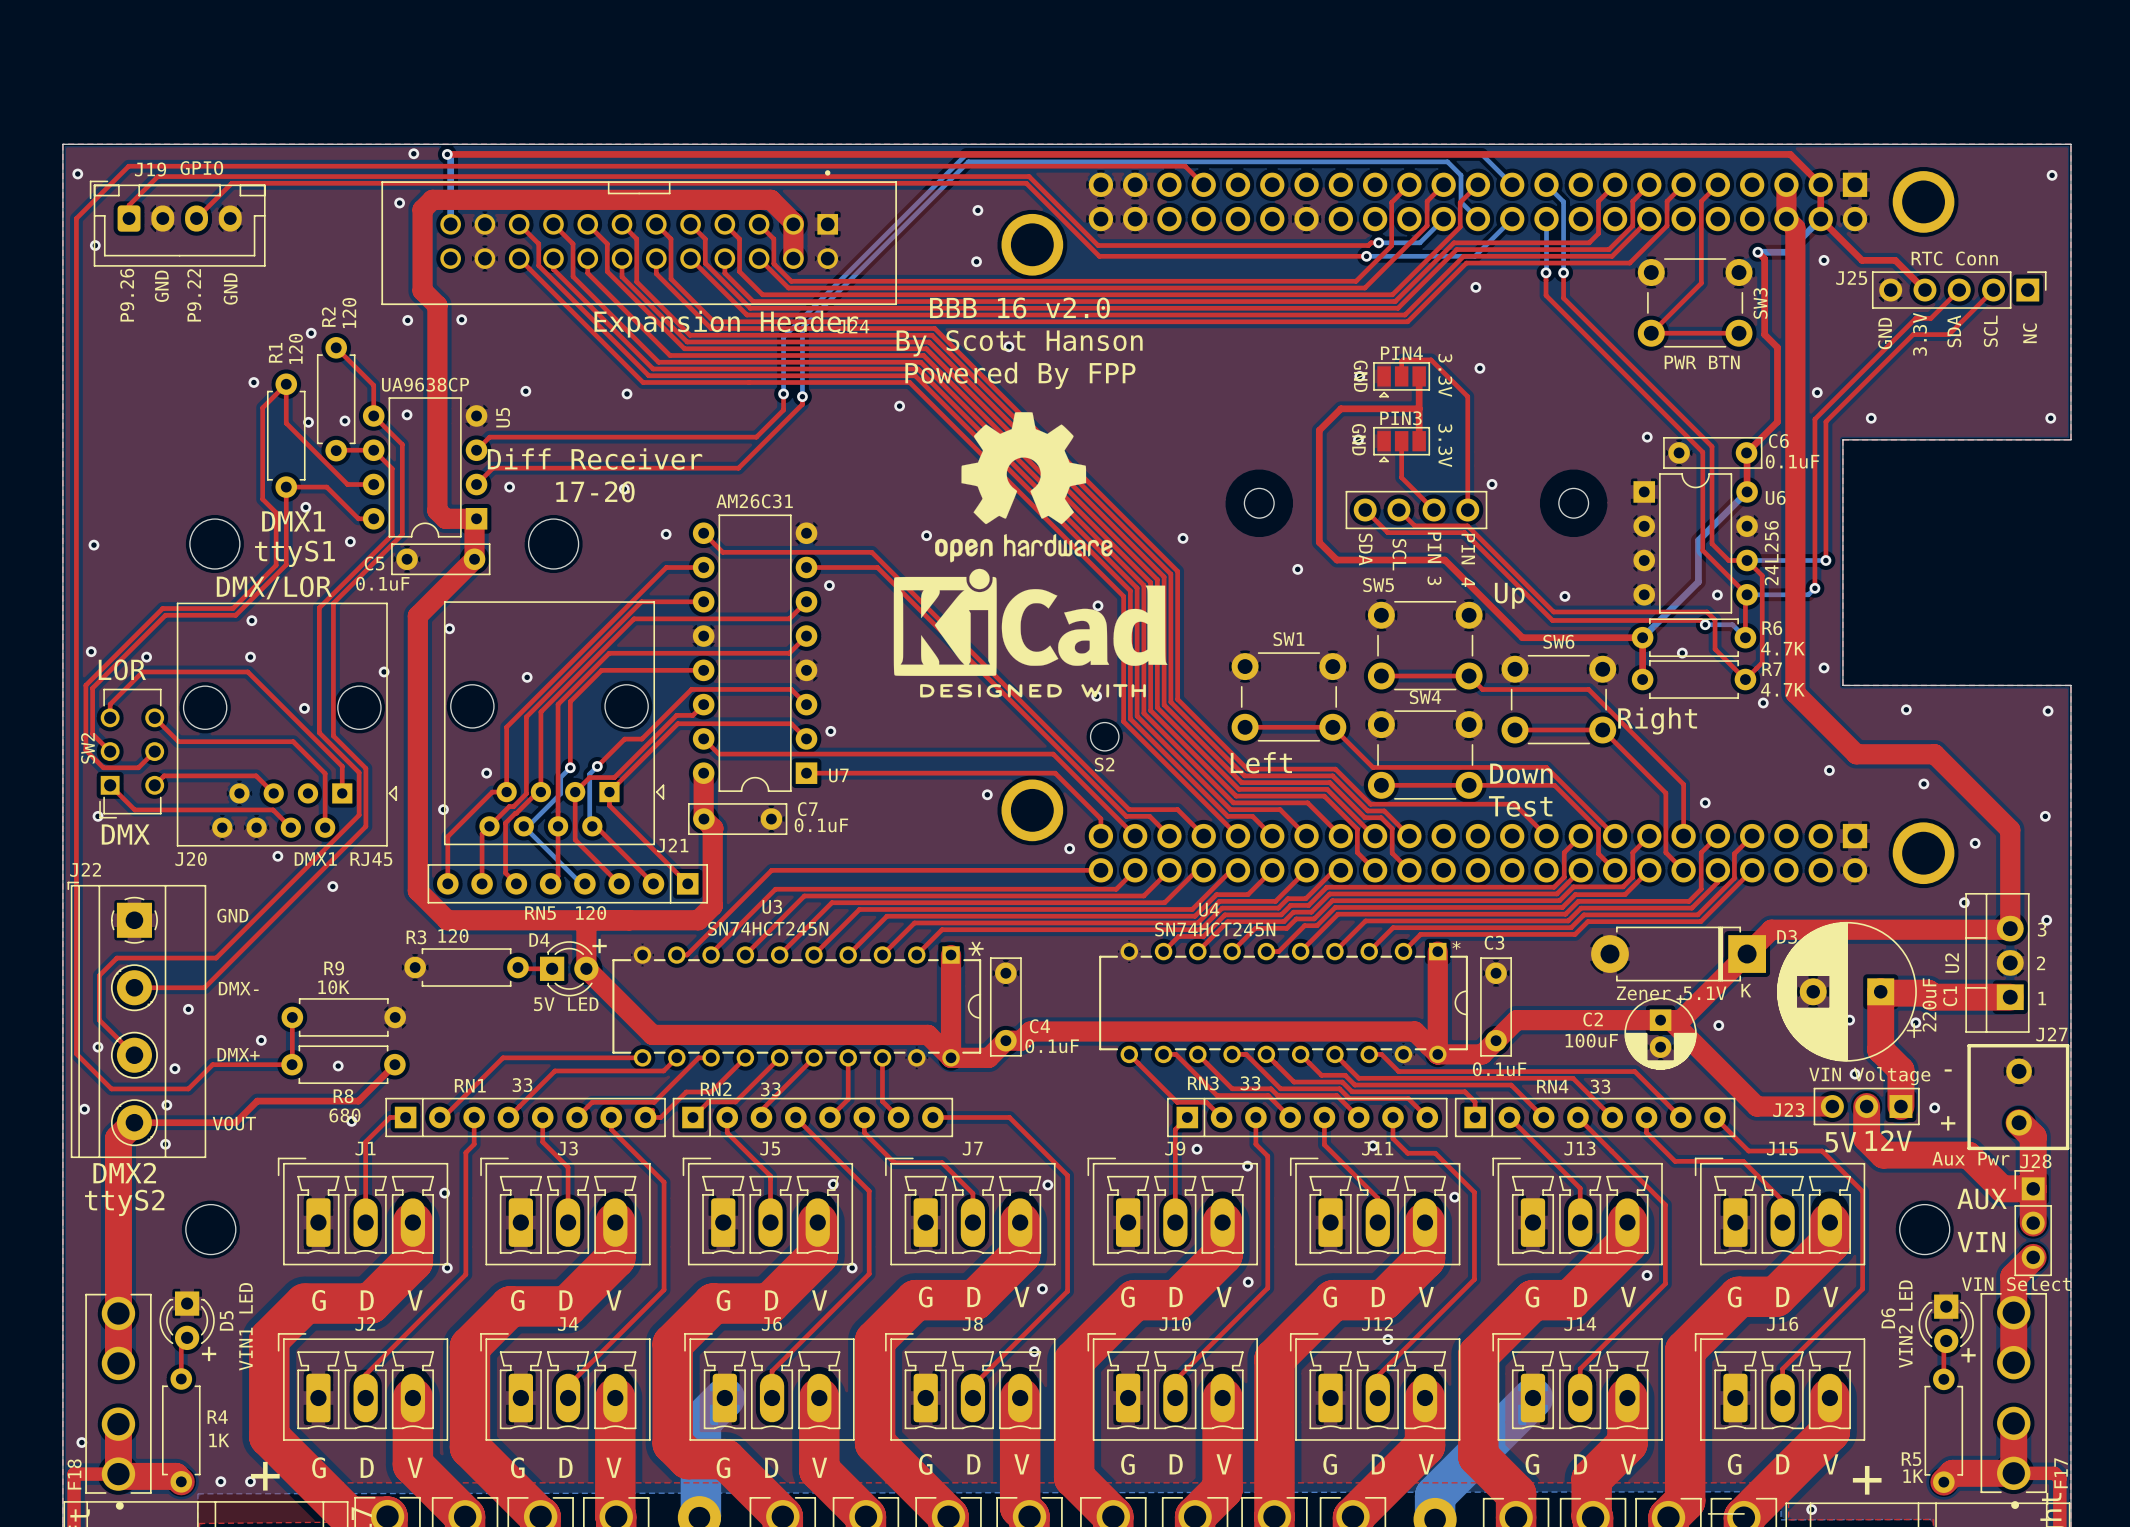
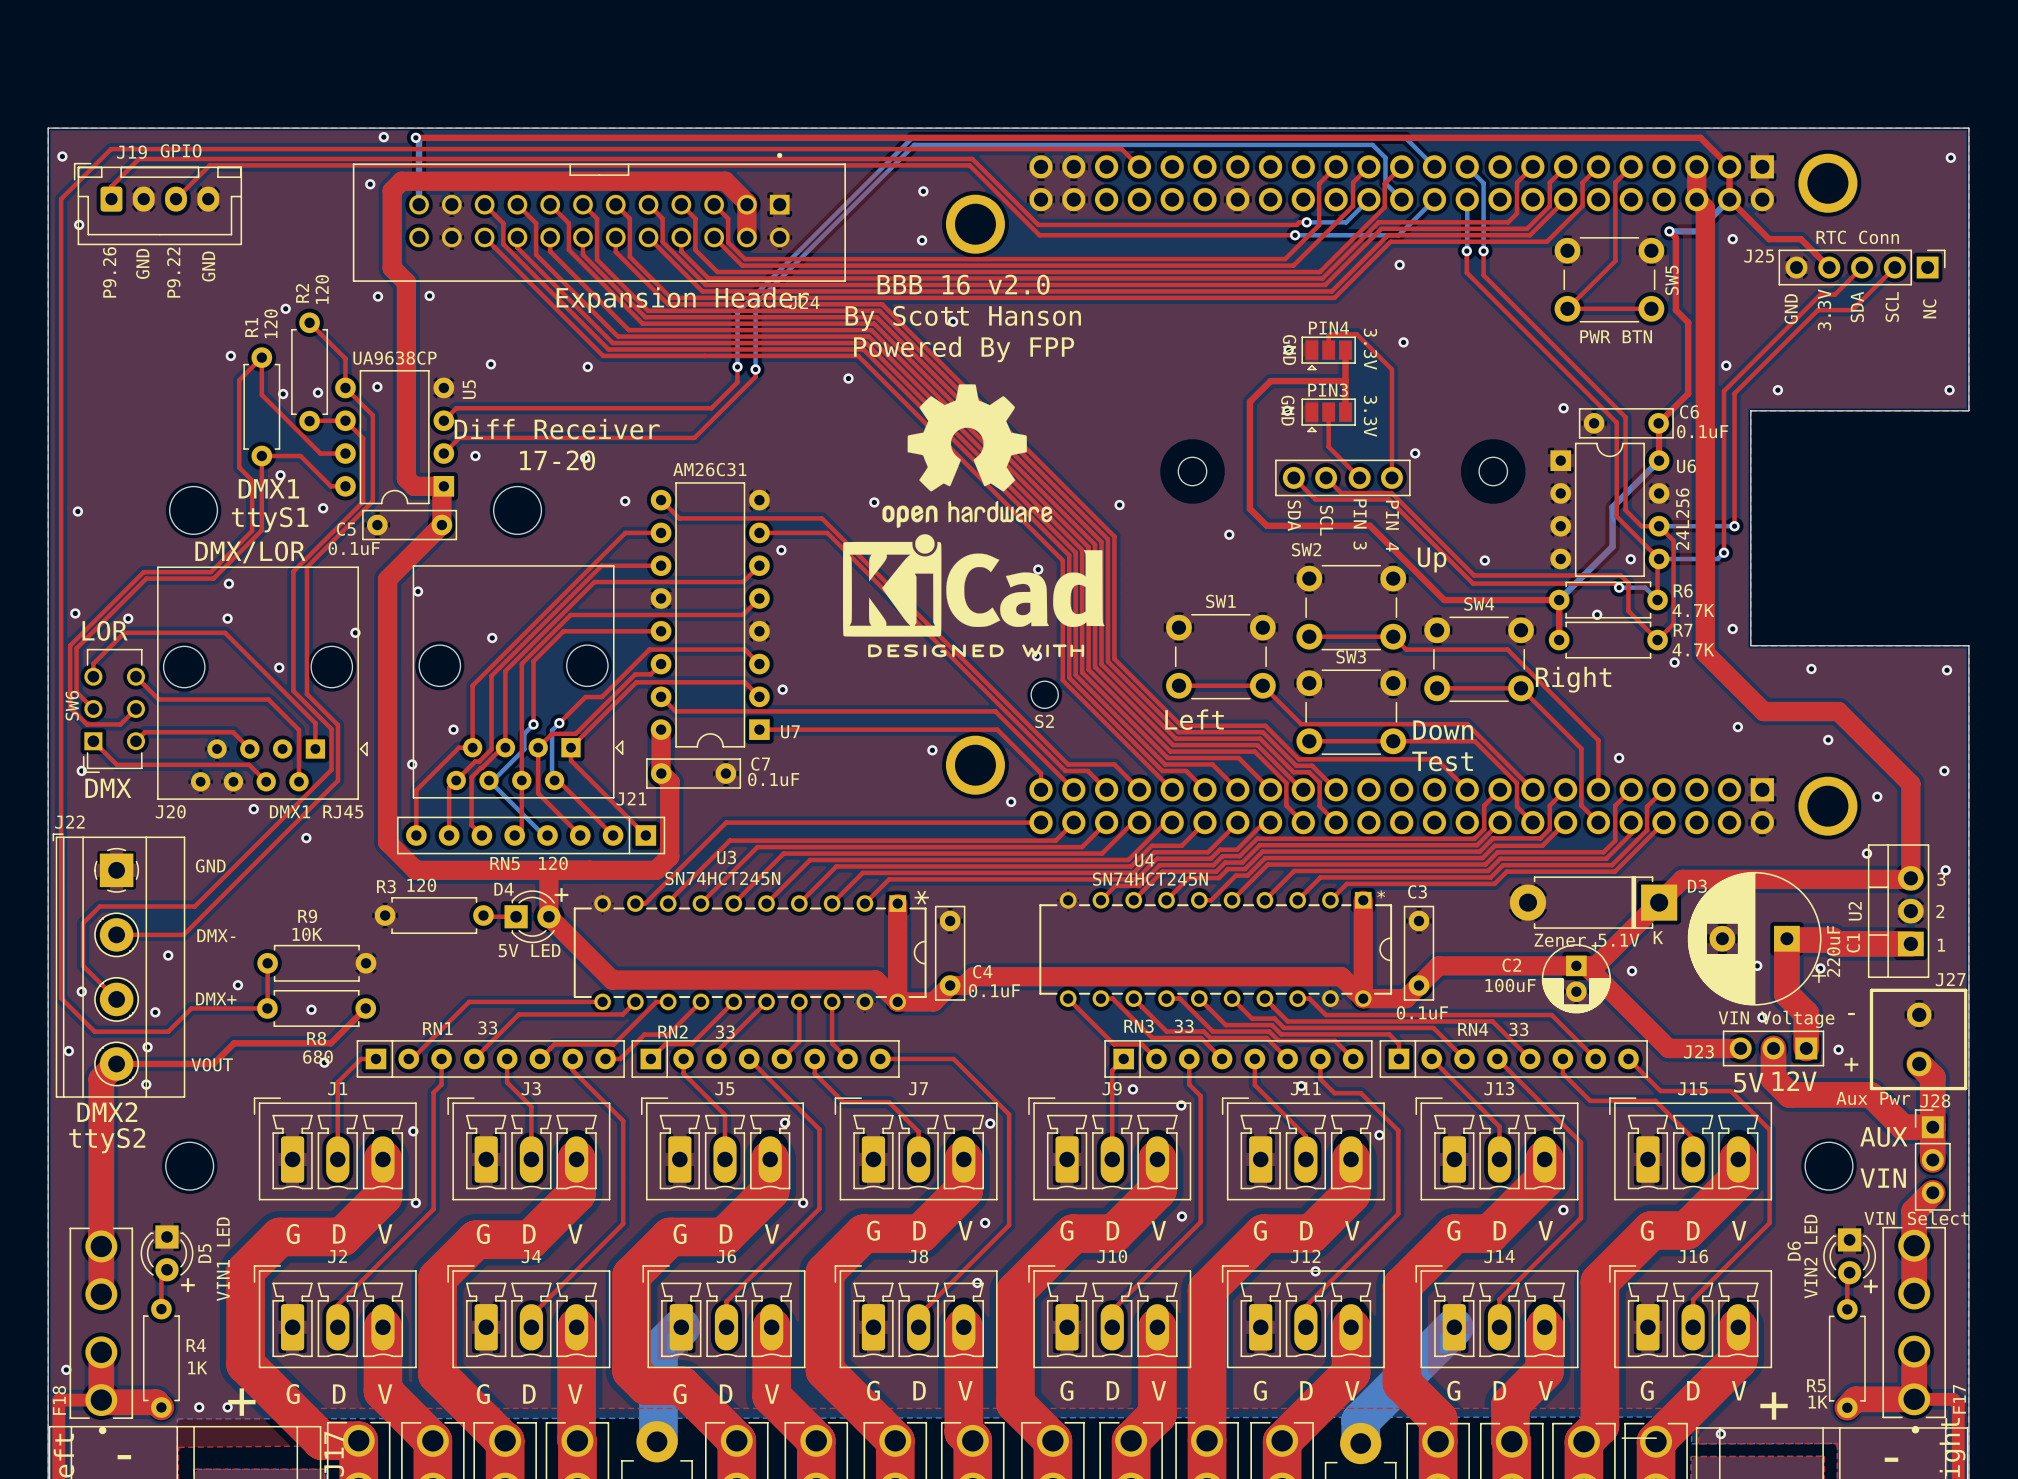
SW3 name: SW3 (1760, 303) -> SW5 (1671, 280)
SW5 name: SW5 (1378, 585) -> SW2 (1306, 549)
SW6 name: SW6 (1558, 641) -> SW4 (1479, 603)
SW4 name: SW4 (1425, 697) -> SW3 (1351, 656)
SW2 name: SW2 (88, 748) -> SW6 (72, 705)

